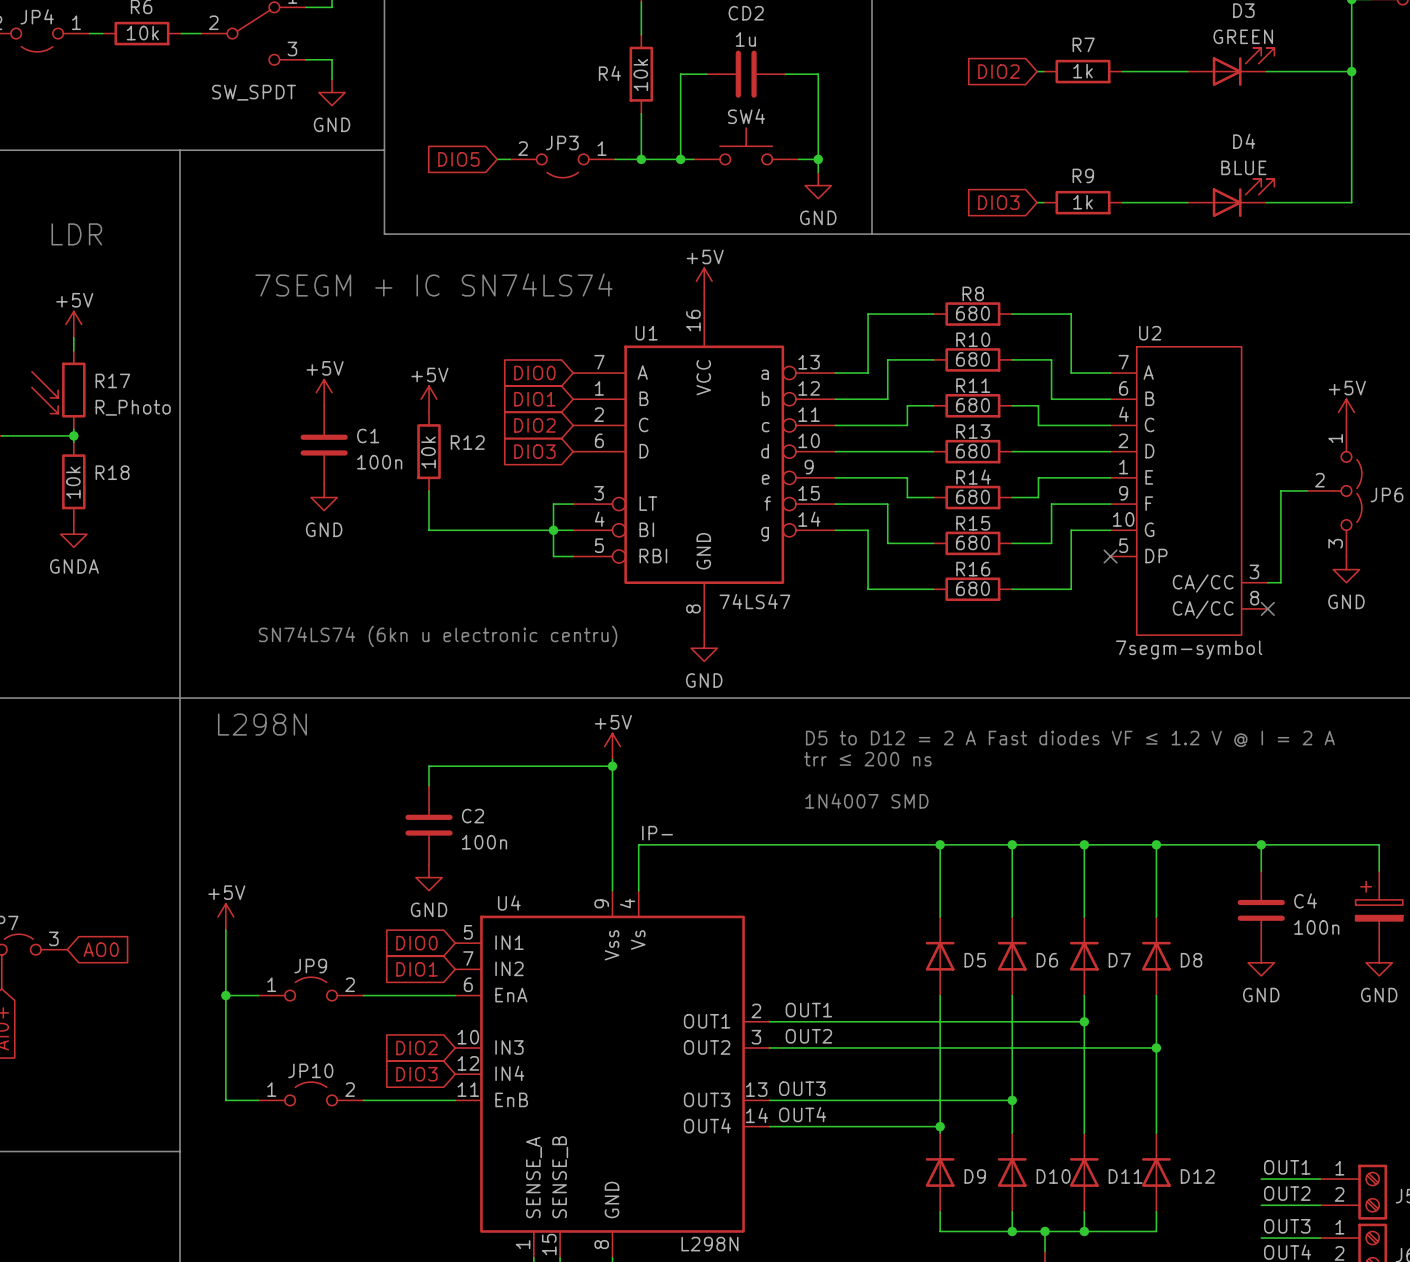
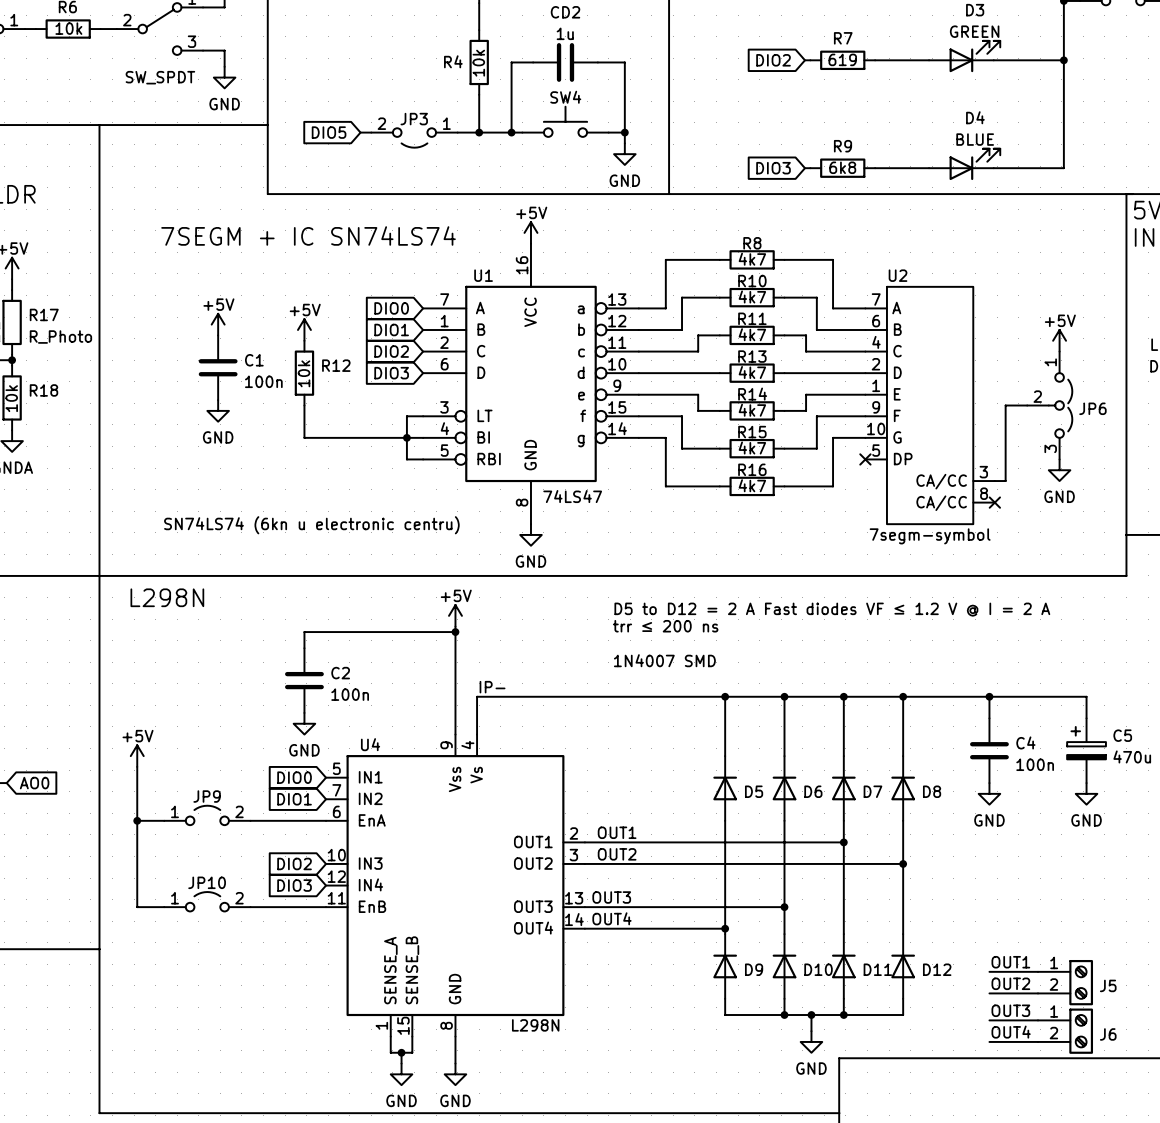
R7 value: 1k (1083, 71) -> 619 (842, 59)
R9 value: 1k (1083, 202) -> 6k8 (842, 167)
R8 value: 680 (972, 313) -> 4k7 (752, 259)
R10 value: 680 (972, 359) -> 4k7 (752, 296)
R11 value: 680 (972, 405) -> 4k7 (752, 334)
R13 value: 680 (972, 451) -> 4k7 (752, 372)
R14 value: 680 (972, 497) -> 4k7 (752, 410)
R15 value: 680 (972, 542) -> 4k7 (752, 448)
R16 value: 680 (972, 588) -> 4k7 (752, 485)

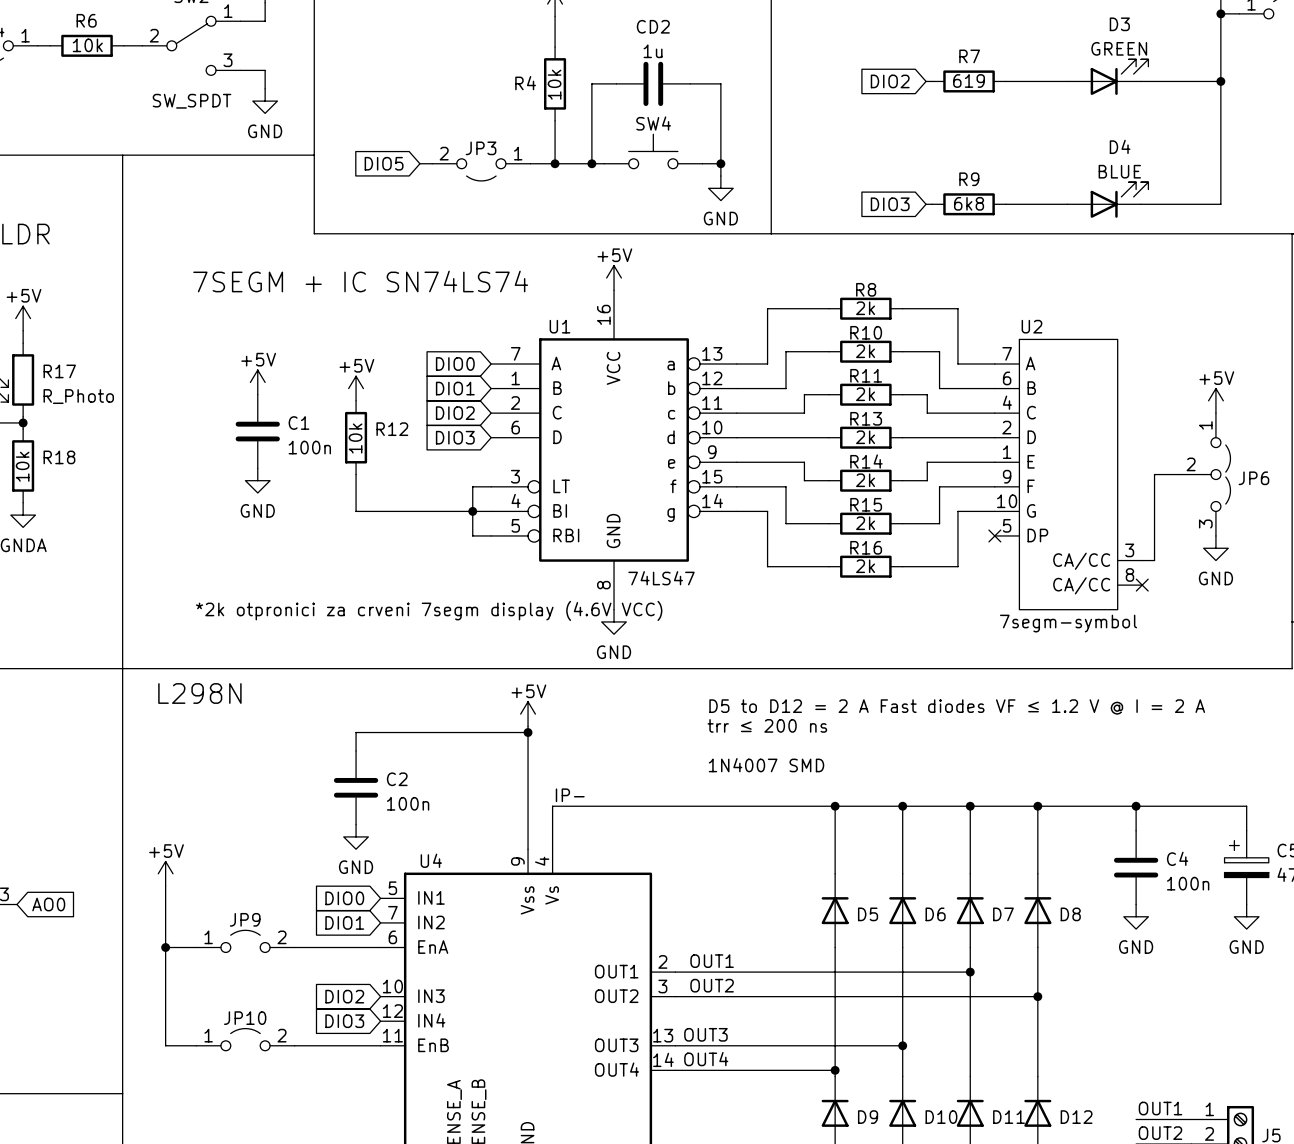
R8 value: 4k7 (752, 259) -> 2k (865, 308)
R10 value: 4k7 (752, 296) -> 2k (865, 351)
R11 value: 4k7 (752, 334) -> 2k (865, 394)
R13 value: 4k7 (752, 372) -> 2k (865, 437)
R14 value: 4k7 (752, 410) -> 2k (865, 480)
R15 value: 4k7 (752, 448) -> 2k (865, 523)
R16 value: 4k7 (752, 485) -> 2k (865, 566)
text: SN74LS74 (6kn u electronic centru) (311, 525) -> *2k otpronici za crveni 7segm display (4.6V VCC) (429, 610)

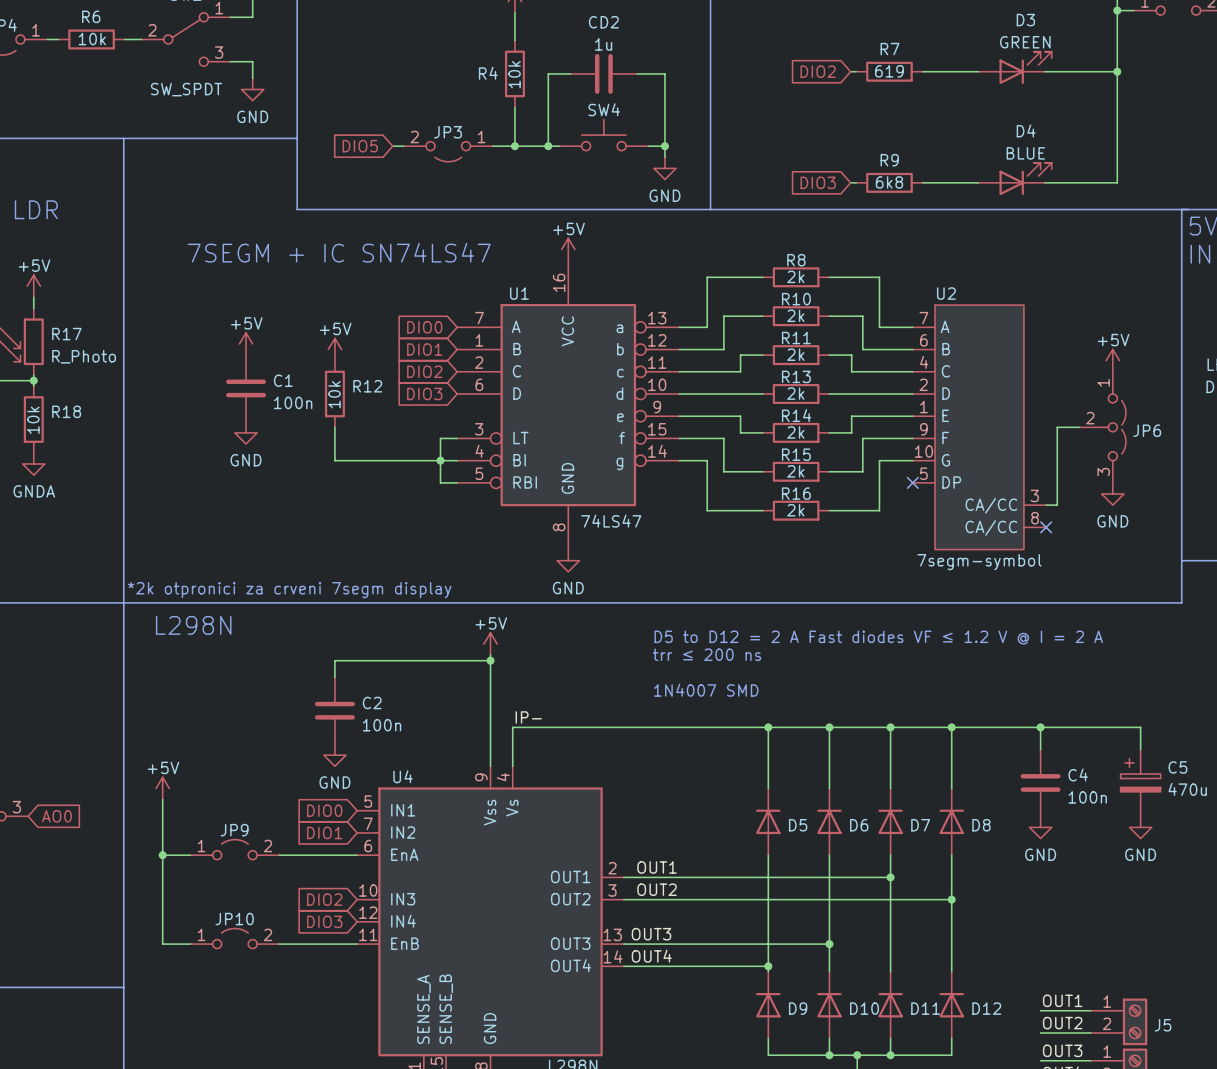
text: 7SEGM + IC SN74LS74 (360, 281) -> 7SEGM + IC SN74LS47 (339, 252)
text: *2k otpronici za crveni 7segm display (4.6V VCC) (429, 610) -> none
text: none -> *2k otpronici za crveni 7segm display (289, 590)

